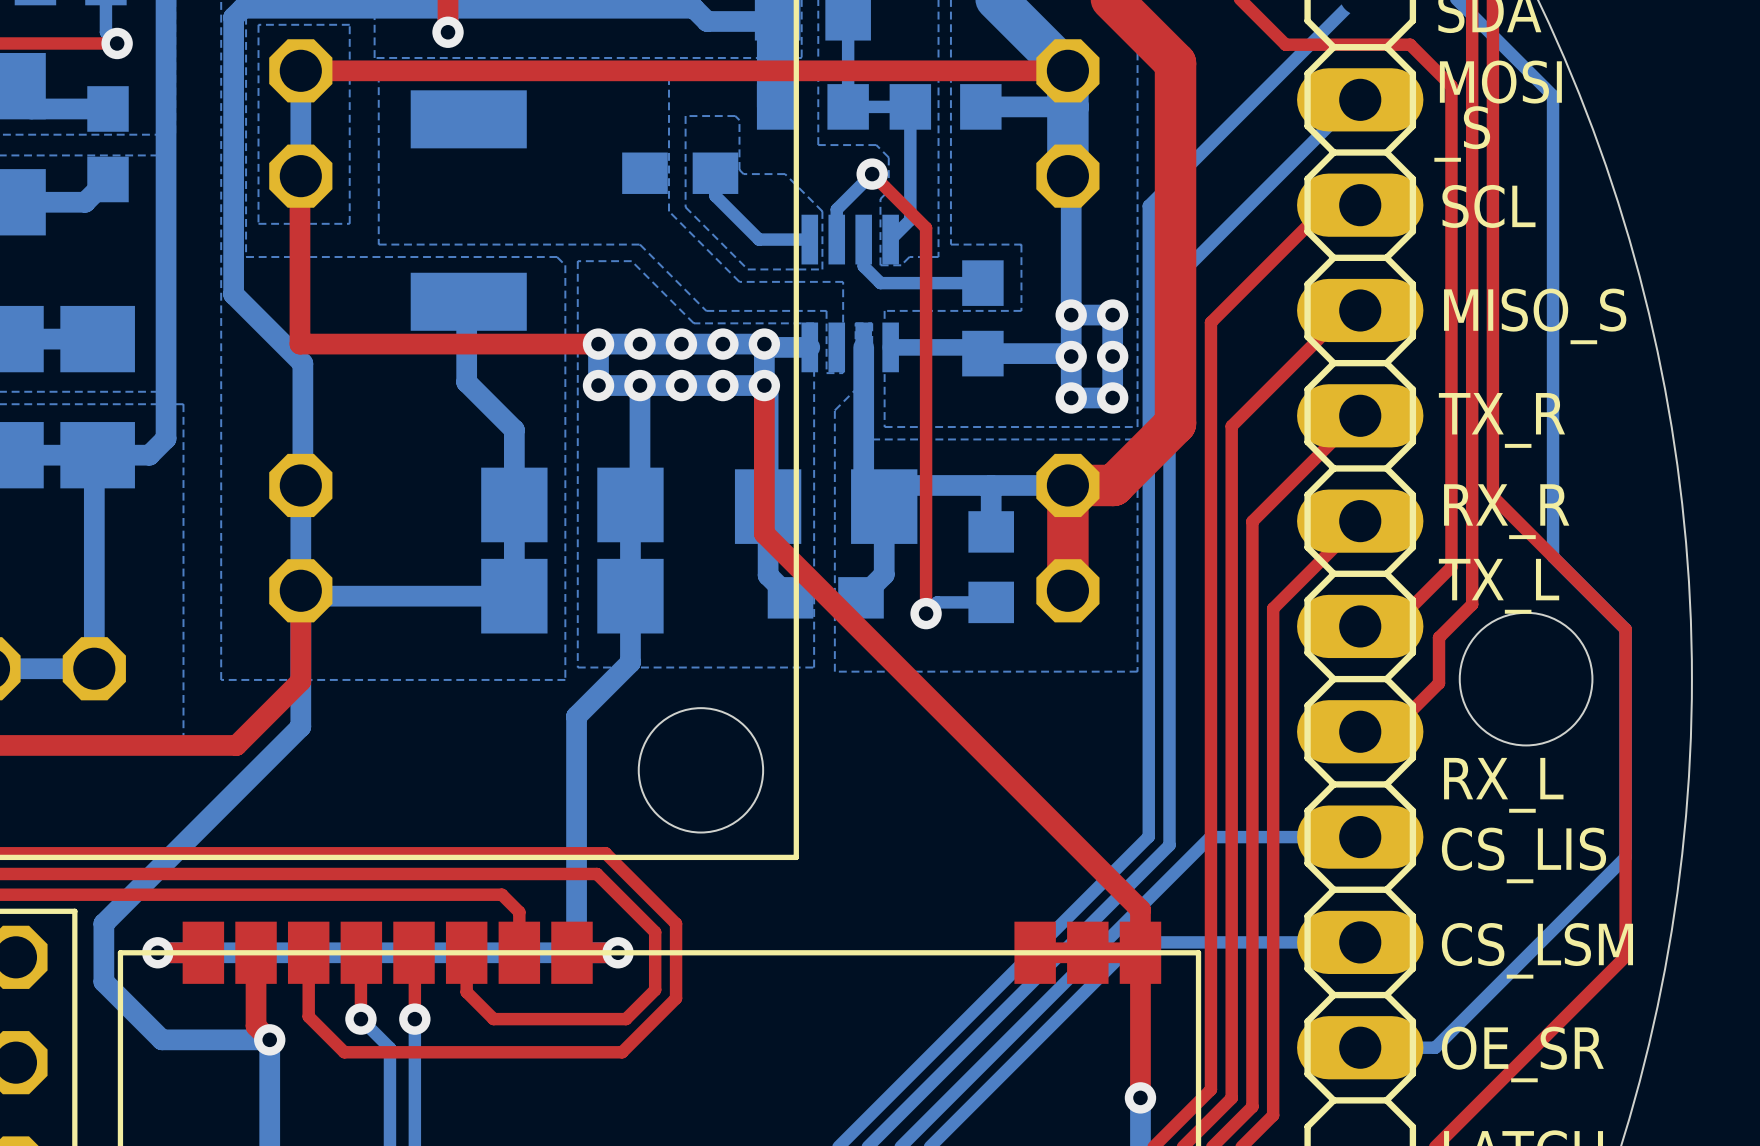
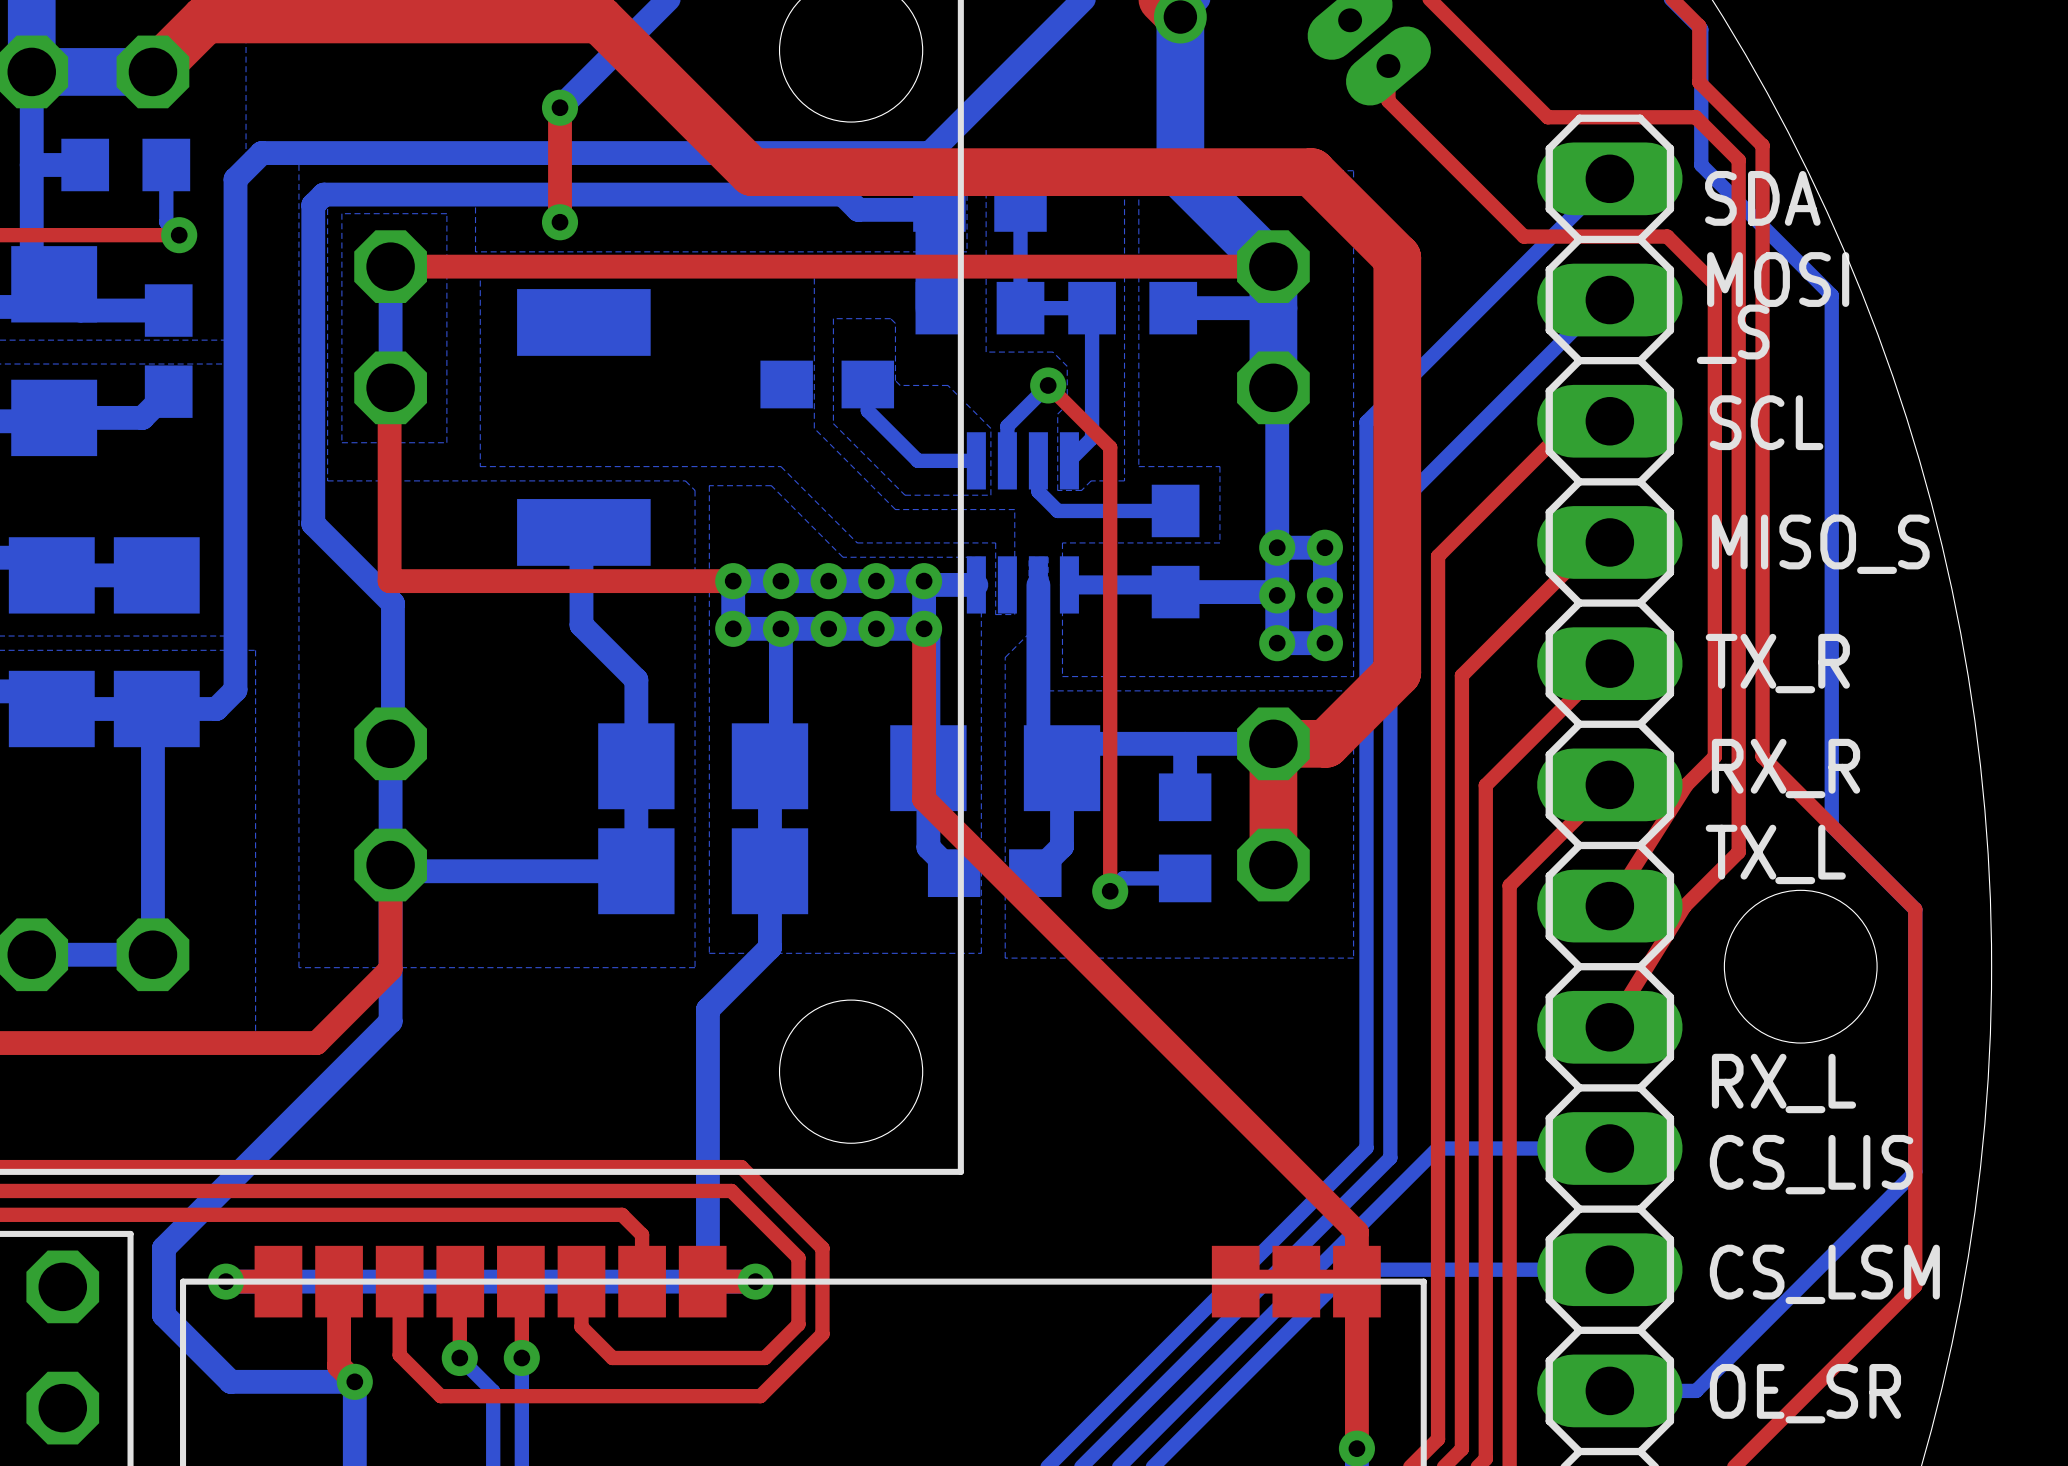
top track: (1451, 496) (1451, 567) (1392, 626) (1360, 626) -> (1714, 756) (1686, 784) (1609, 906)
top track: (1472, 579) (1472, 604) (1439, 637) (1439, 683) (1390, 731) (1360, 731) -> (1738, 852) (1684, 906) (1609, 1027)

